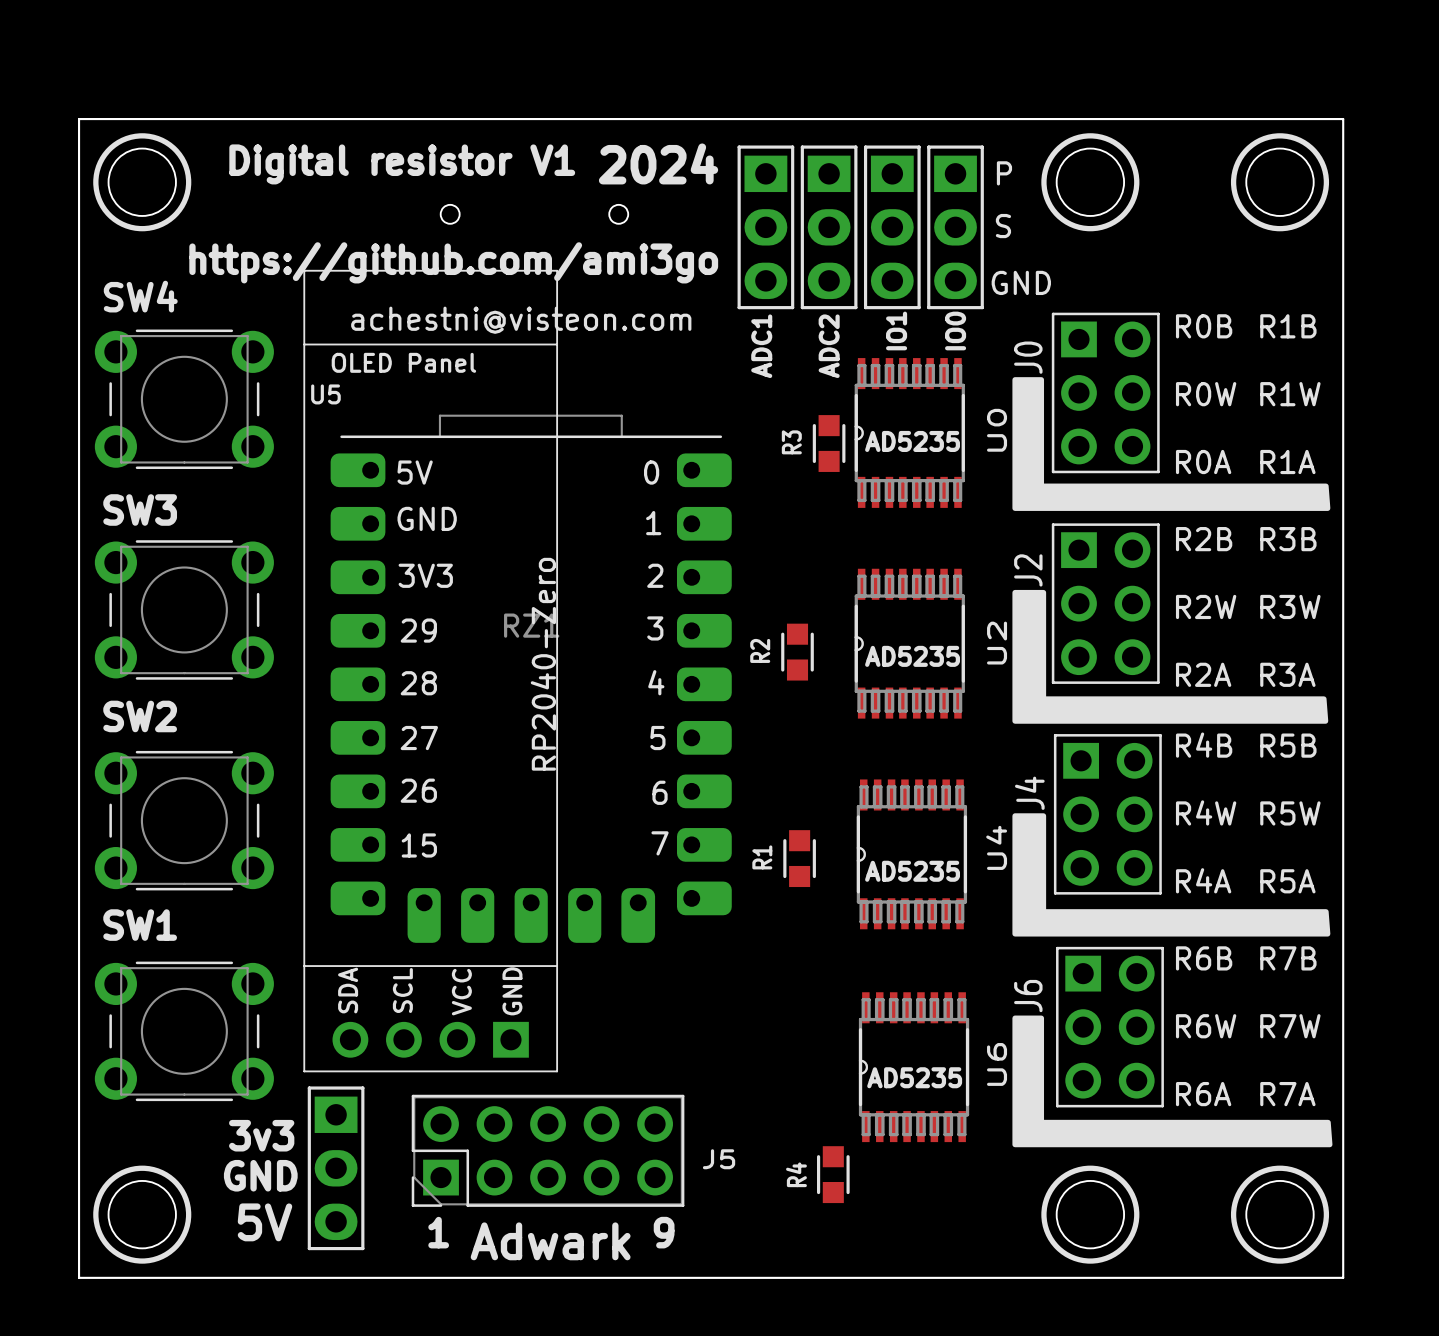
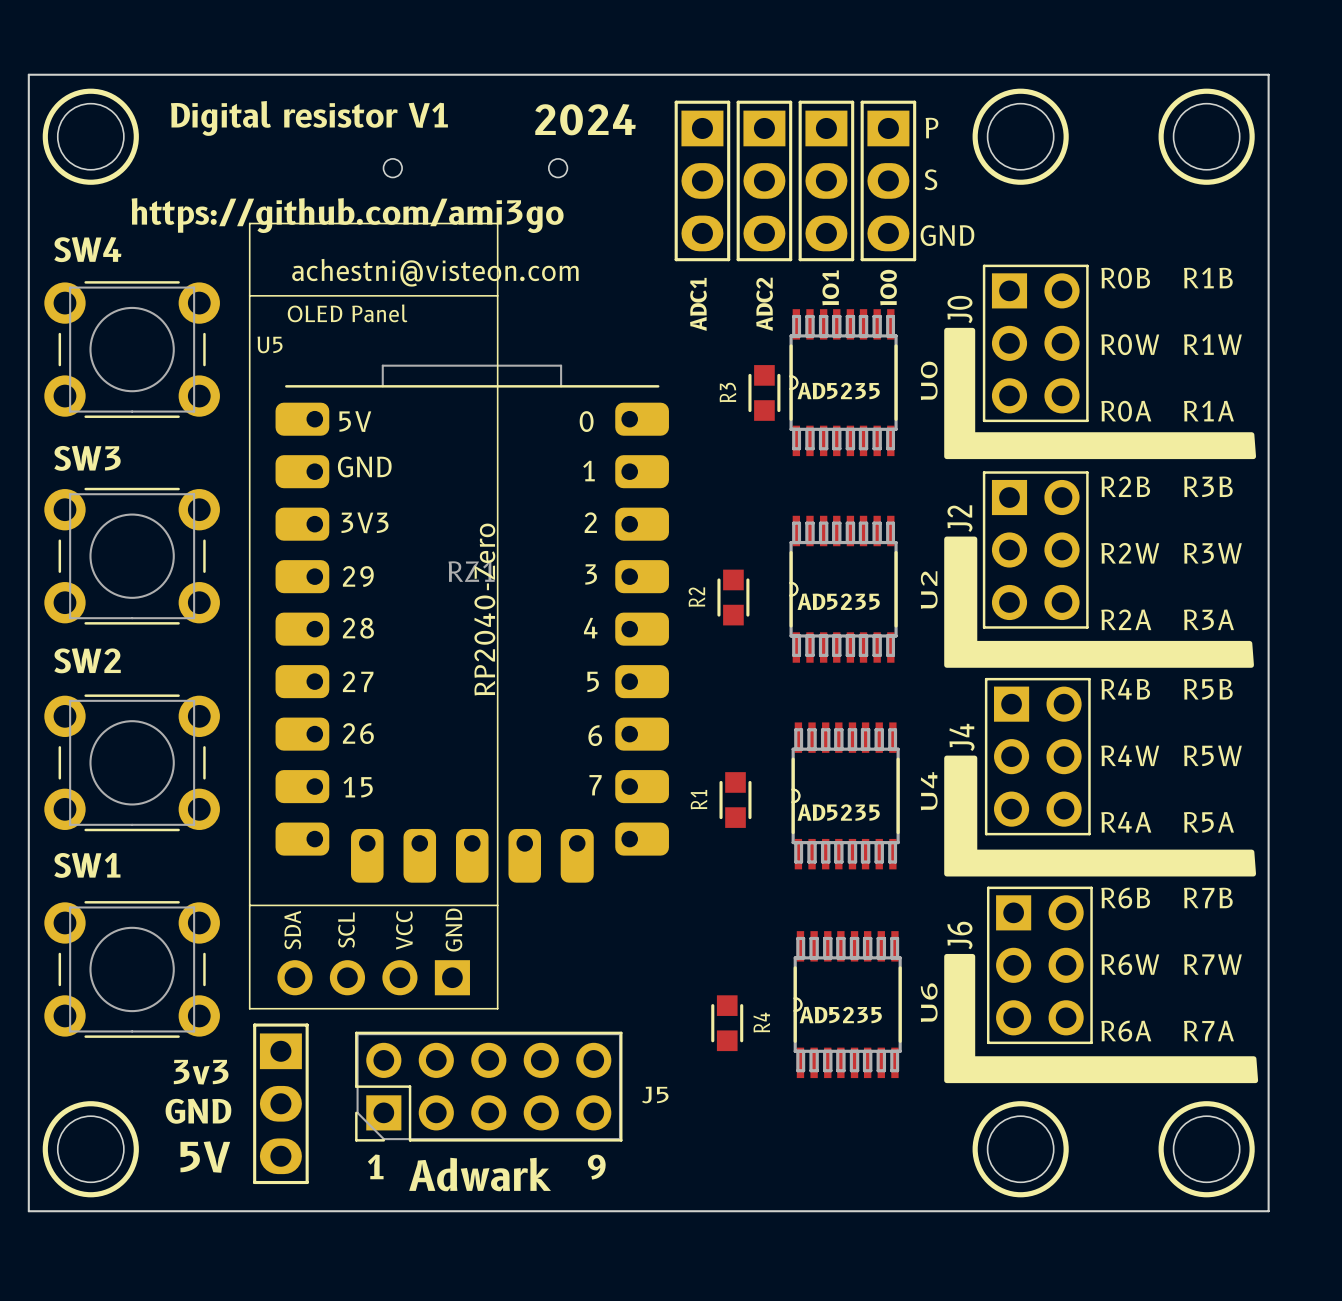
R4 name position: R4 (796, 1174) -> R4 (761, 1022)
R4 position: (833, 1174) -> (727, 1023)

